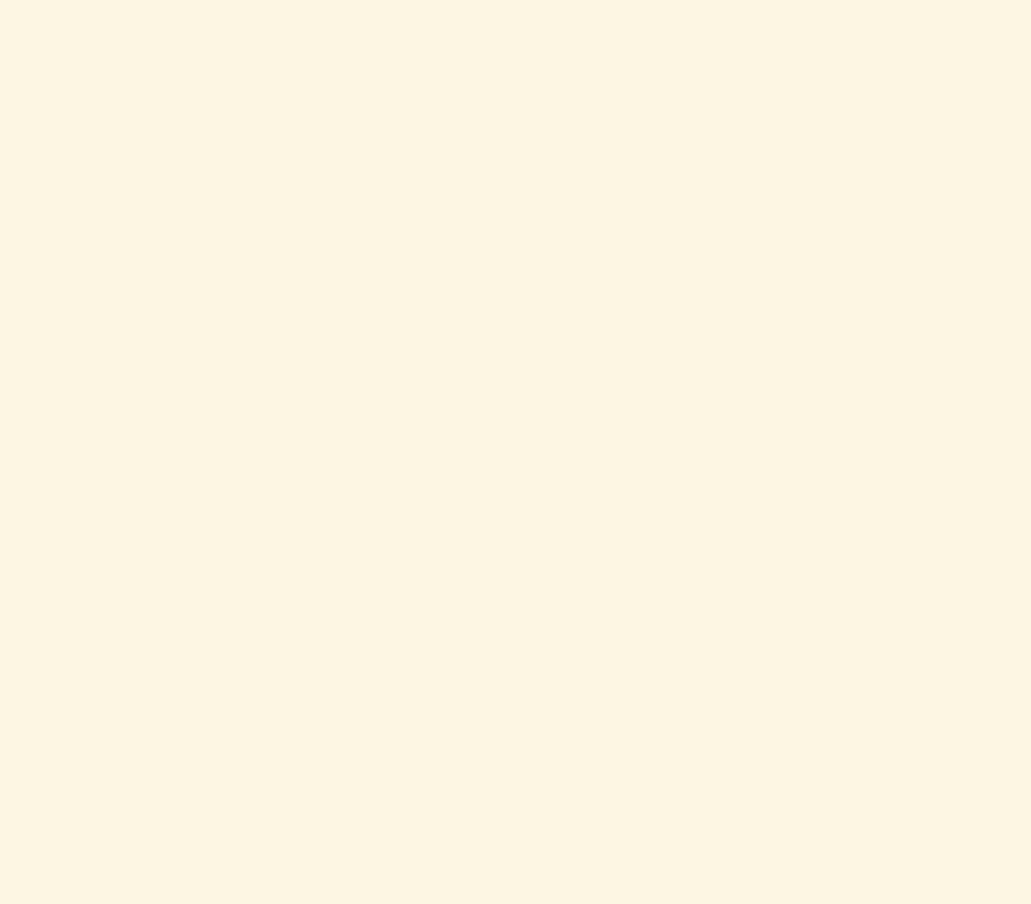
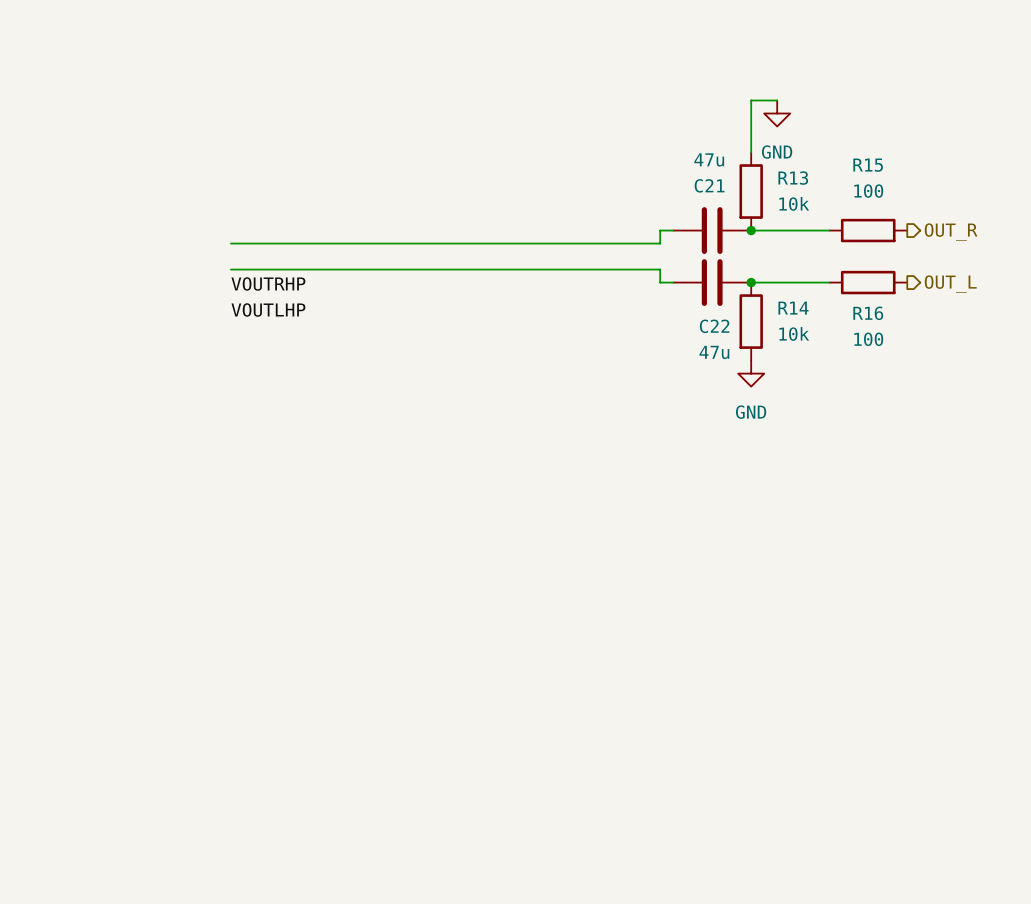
wire: none -> (777, 100) (751, 100) (751, 152)
power symbol: none -> GND (777, 113)
R13: none -> 10k (751, 191)
wire: none -> (673, 230) (660, 230) (660, 243) (230, 243)
C21: none -> 47u (712, 230)
wire: none -> (751, 230) (829, 230)
junction: none -> (751, 230)
R15: none -> 100 (868, 230)
hierarchical label: none -> OUT_R (951, 232)
wire: none -> (230, 269) (660, 269) (660, 282) (673, 282)
C22: none -> 47u (712, 282)
wire: none -> (751, 282) (829, 282)
junction: none -> (751, 282)
R16: none -> 100 (868, 282)
hierarchical label: none -> OUT_L (950, 284)
label: none -> VOUTRHP (268, 283)
label: none -> VOUTLHP (268, 309)
R14: none -> 10k (751, 321)
power symbol: none -> GND (751, 373)

